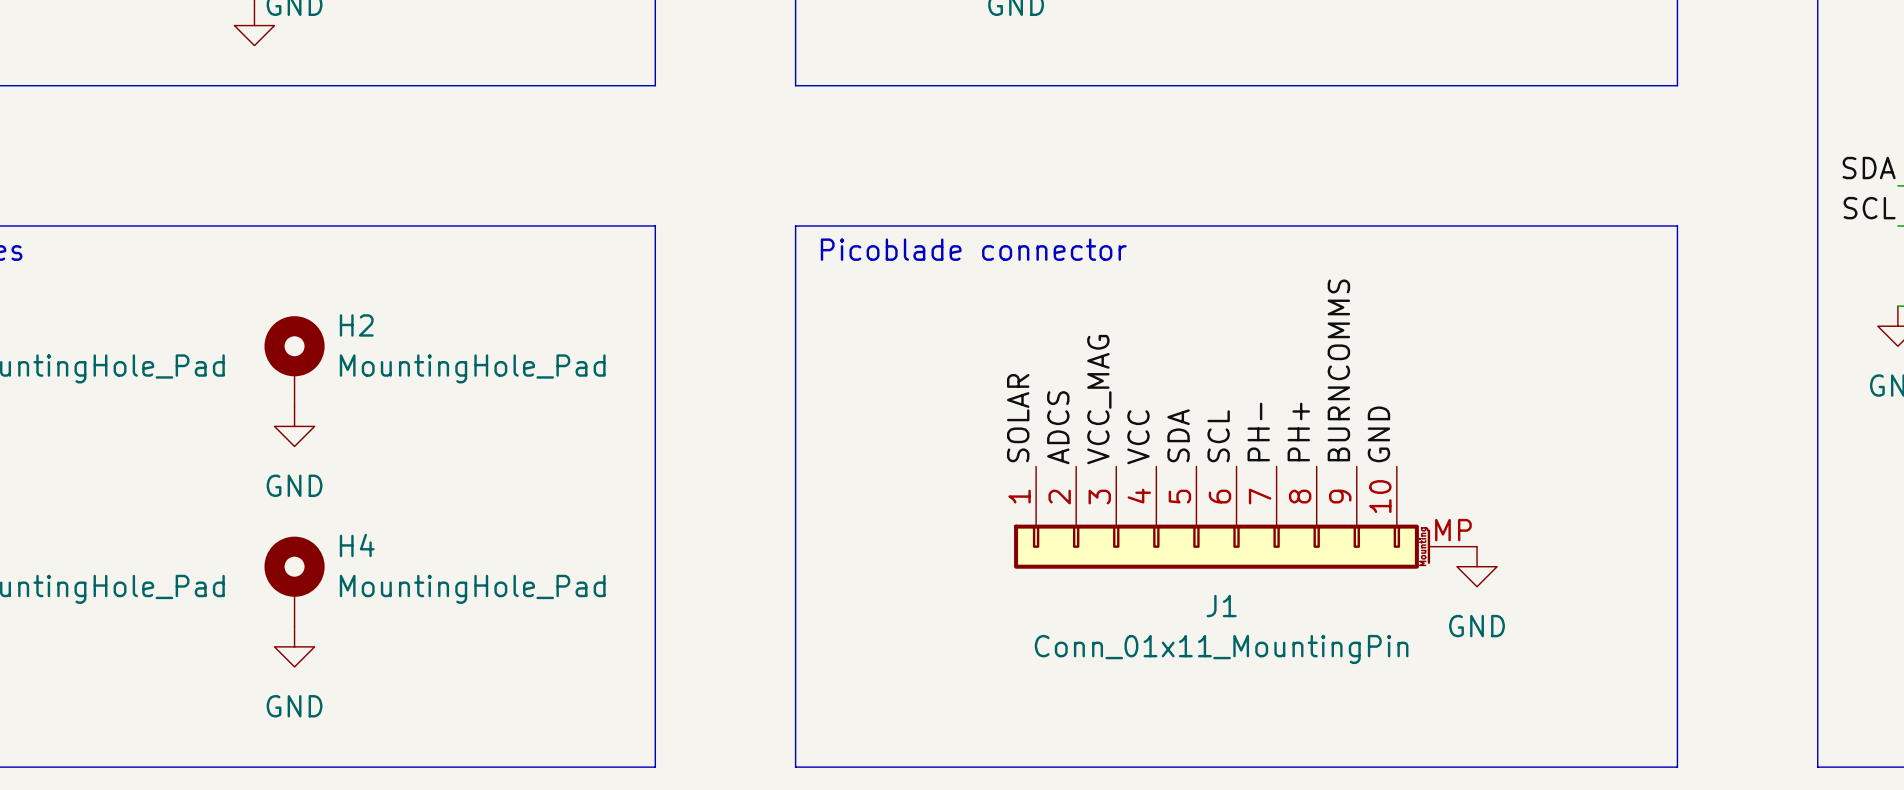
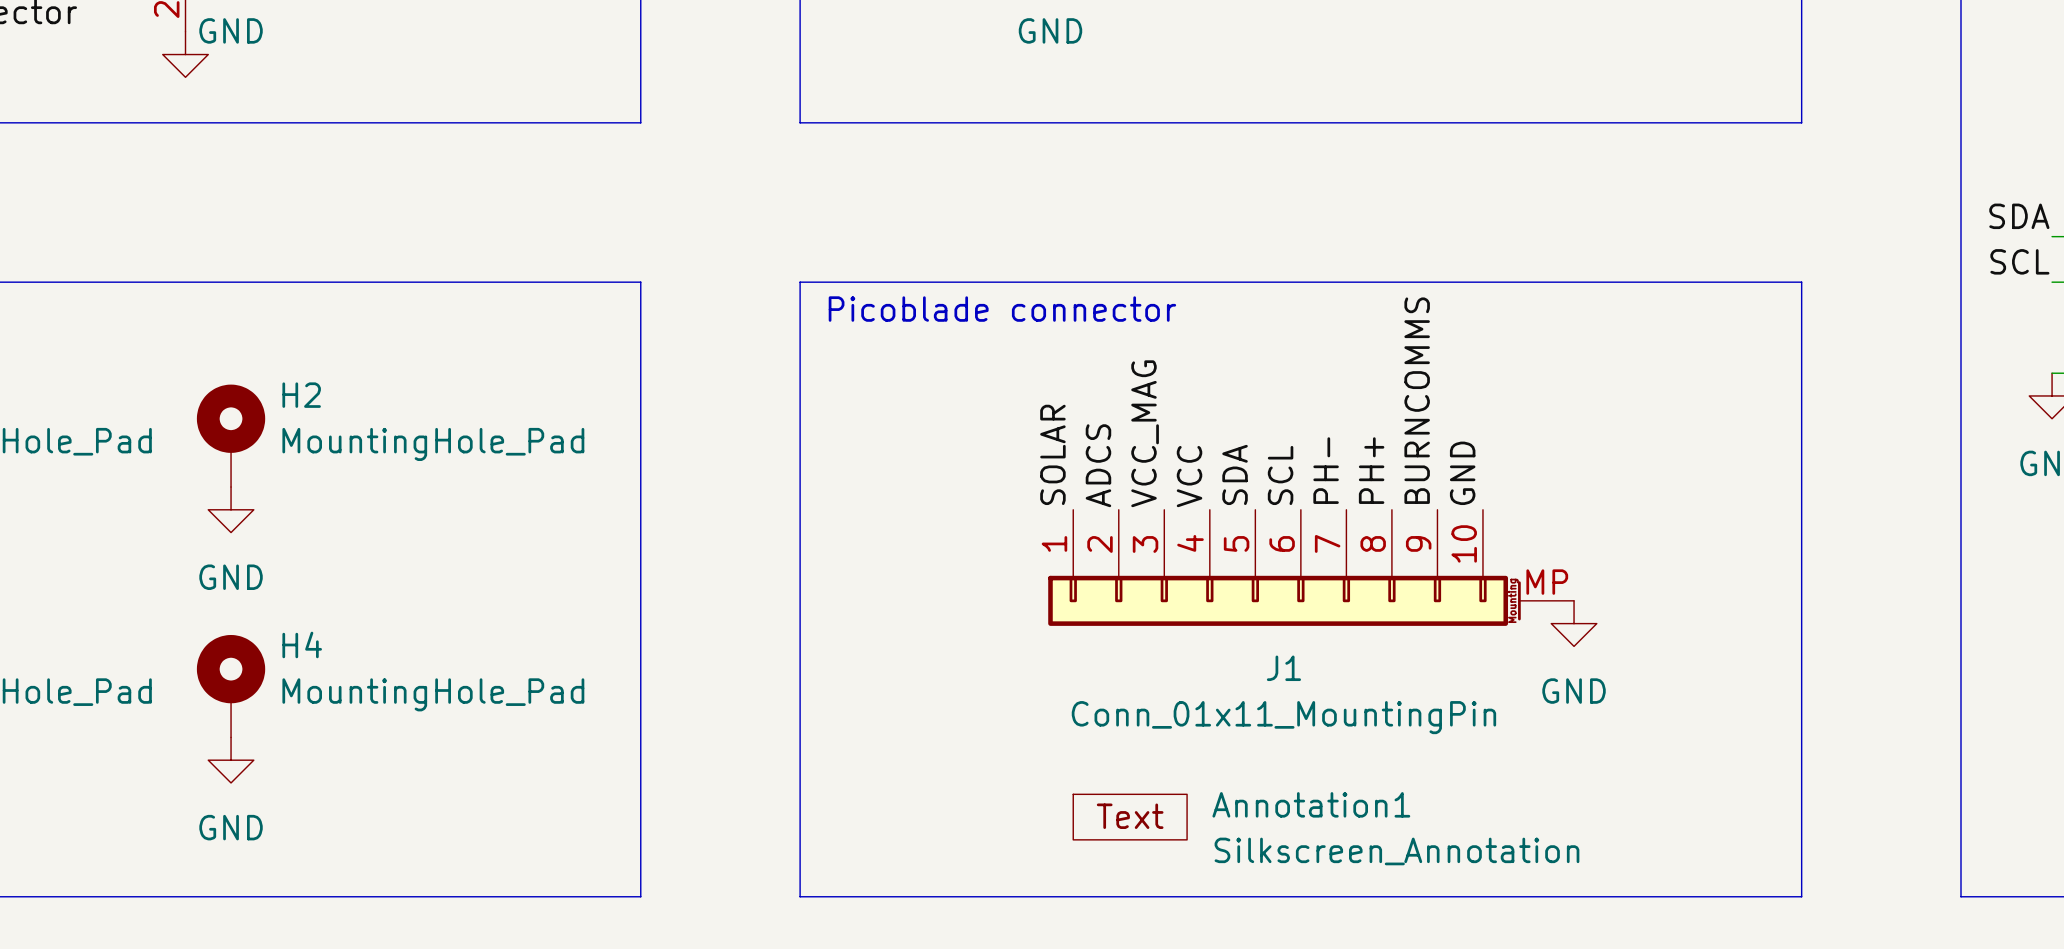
label position: BURNCOMMS (1338, 370) -> BURNCOMMS (1417, 400)
label position: VCC_MAG (1099, 399) -> VCC_MAG (1145, 433)
label position: SOLAR (1018, 418) -> SOLAR (1052, 454)
label position: ADCS (1058, 427) -> ADCS (1098, 465)
label position: PH- (1258, 431) -> PH- (1326, 470)
label position: PH+ (1298, 431) -> PH+ (1371, 470)
label position: GND (1378, 434) -> GND (1462, 473)
label position: SDA (1178, 435) -> SDA (1235, 474)
label position: SCL (1218, 436) -> SCL (1280, 475)
label position: VCC (1138, 437) -> VCC (1189, 476)
J1 position: (1245, 517) -> (1311, 567)
power symbol position: GND (1477, 566) -> GND (1574, 623)
Annotation1: none -> Silkscreen_Annotation (1130, 817)

